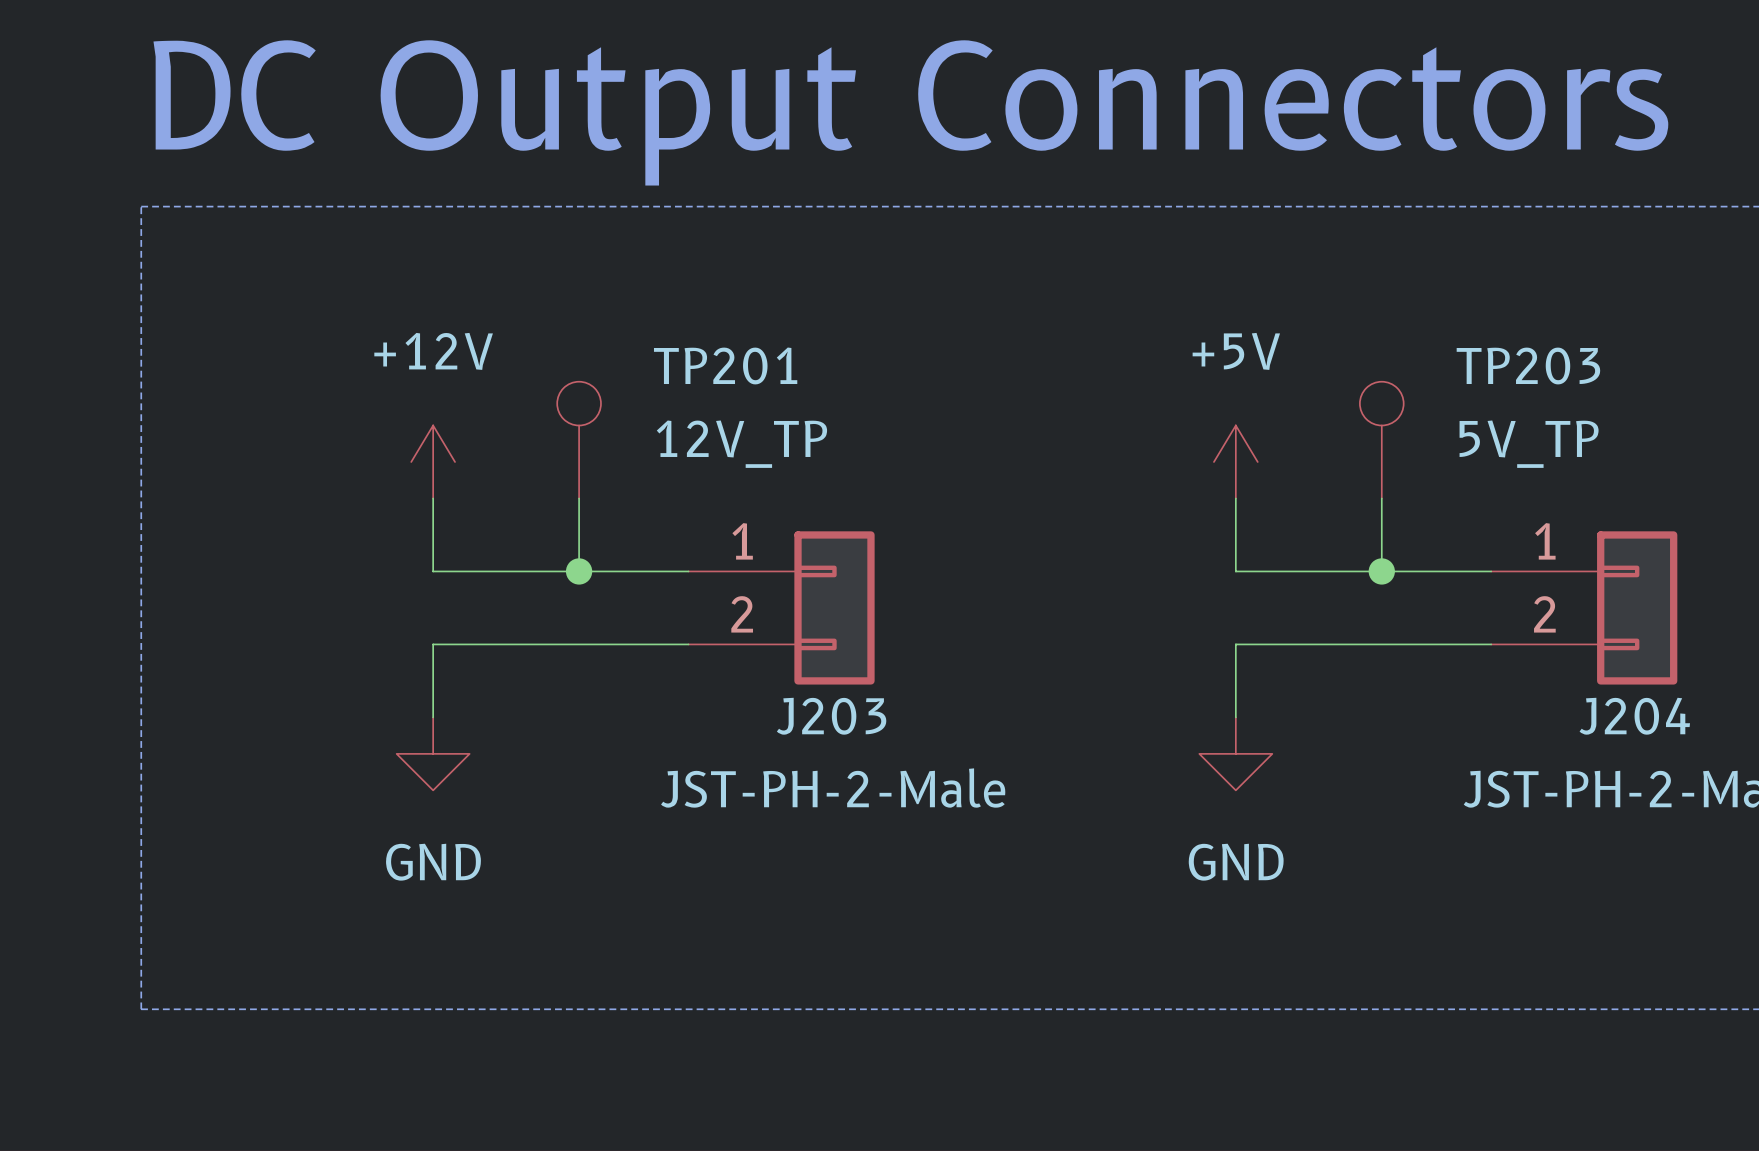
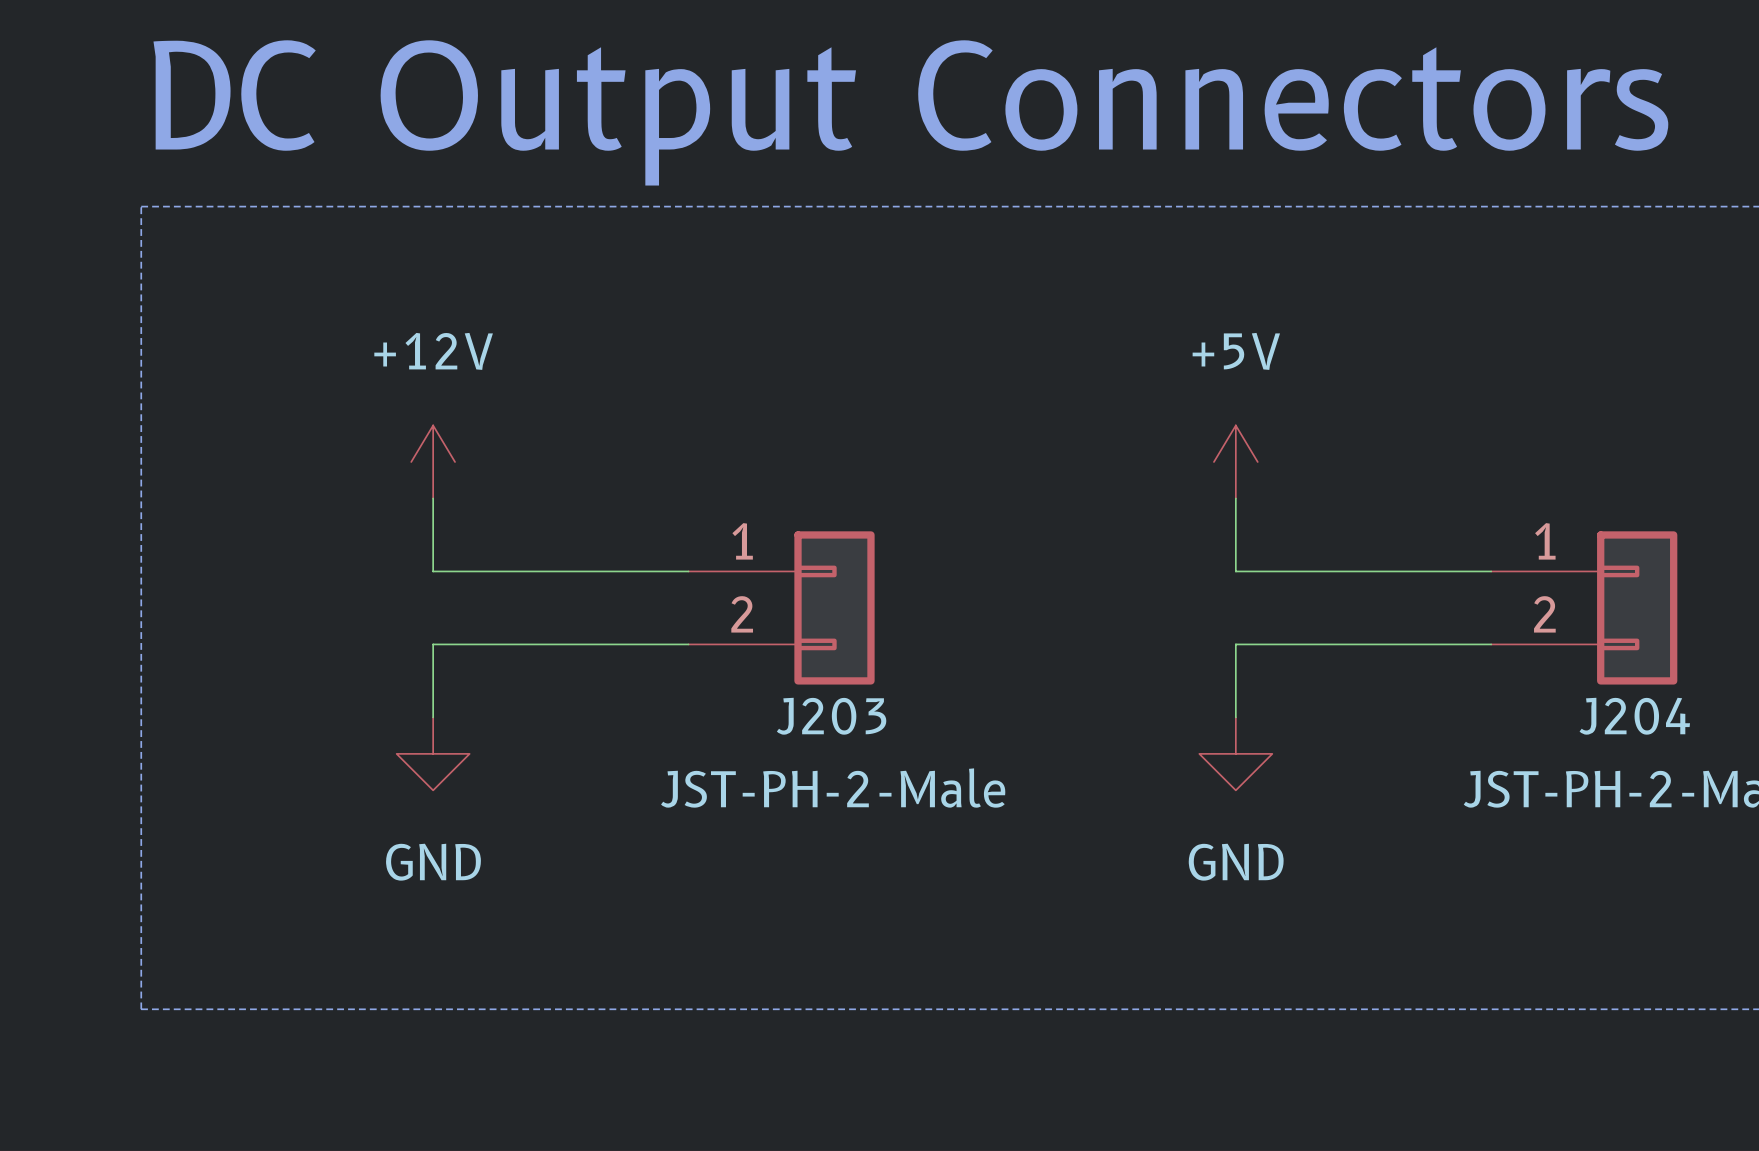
TP201: 12V_TP (579, 440) -> none
TP203: 5V_TP (1381, 440) -> none
wire: (579, 498) (579, 571) -> none
wire: (1381, 498) (1381, 571) -> none
junction: (579, 571) -> none
junction: (1381, 571) -> none

